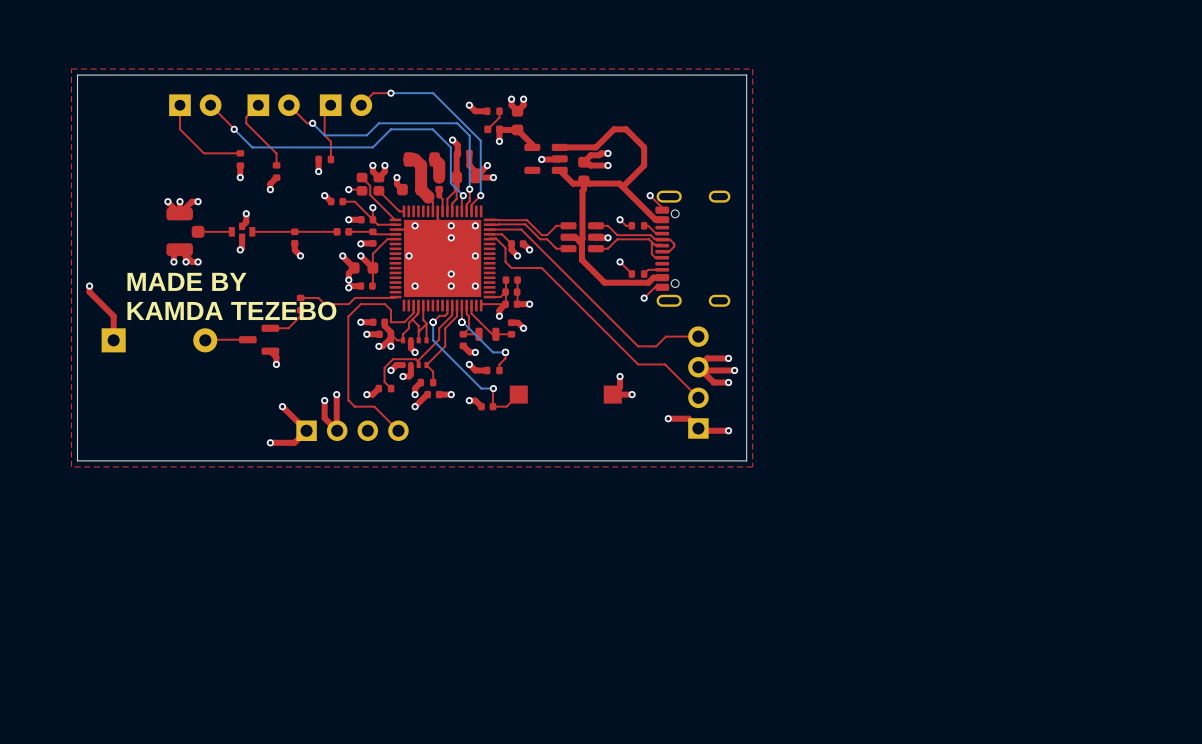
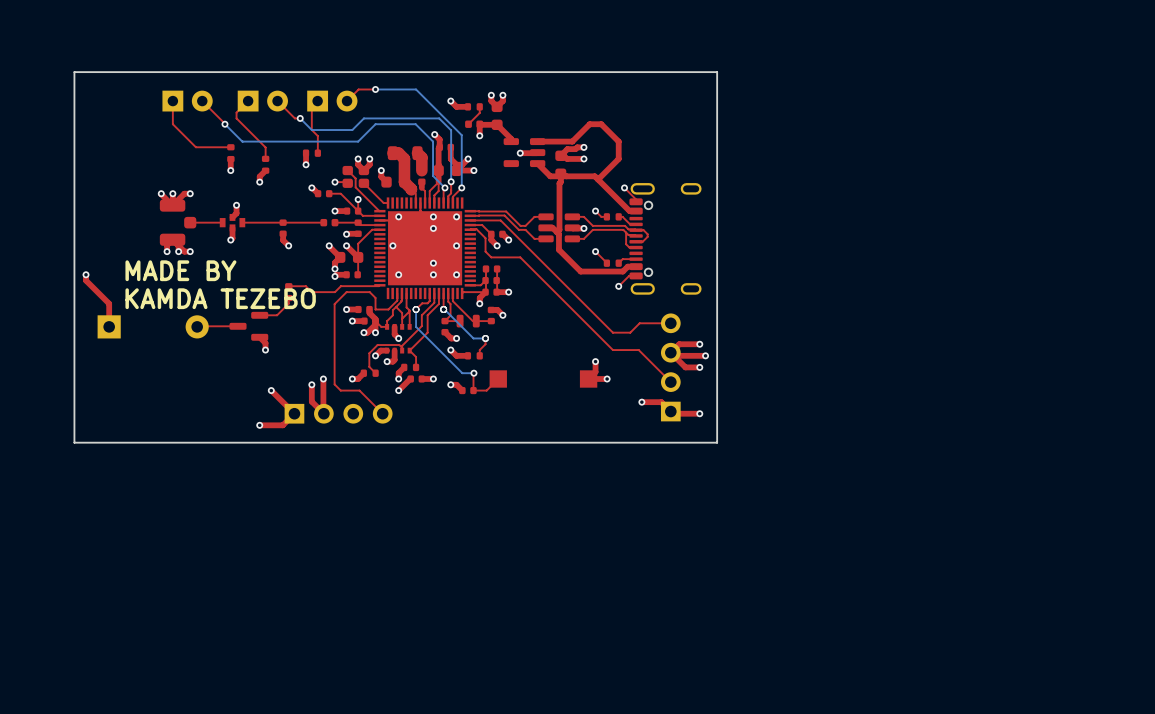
top zone outline: (752, 69) (752, 466) (71, 466) (71, 69) (752, 69) -> none

